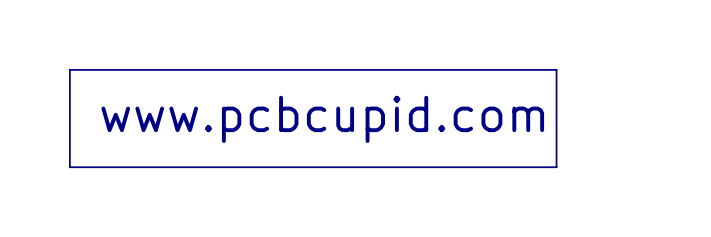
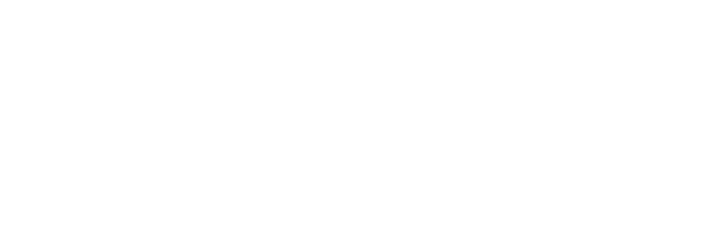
line: (69, 69) (556, 69) (556, 167) (69, 167) (69, 69) -> none
text: www.pcbcupid.com (322, 119) -> none

